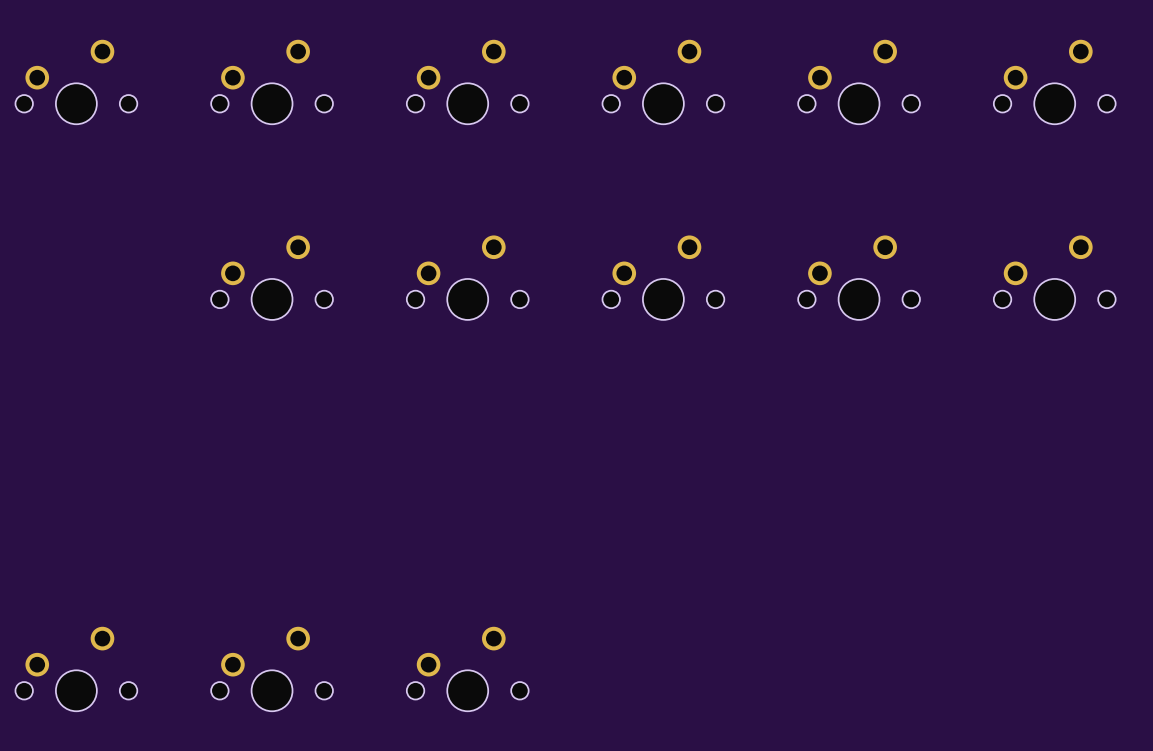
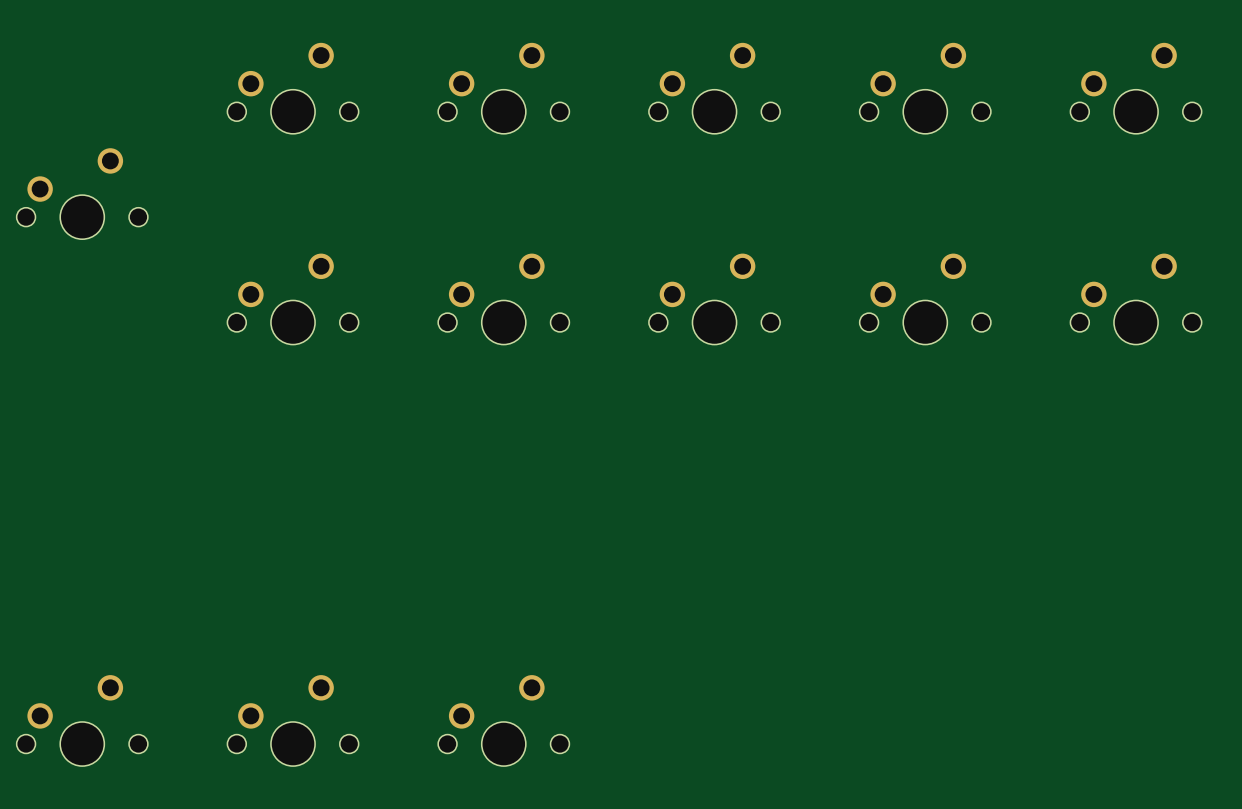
part position: (76, 82) -> (82, 193)

